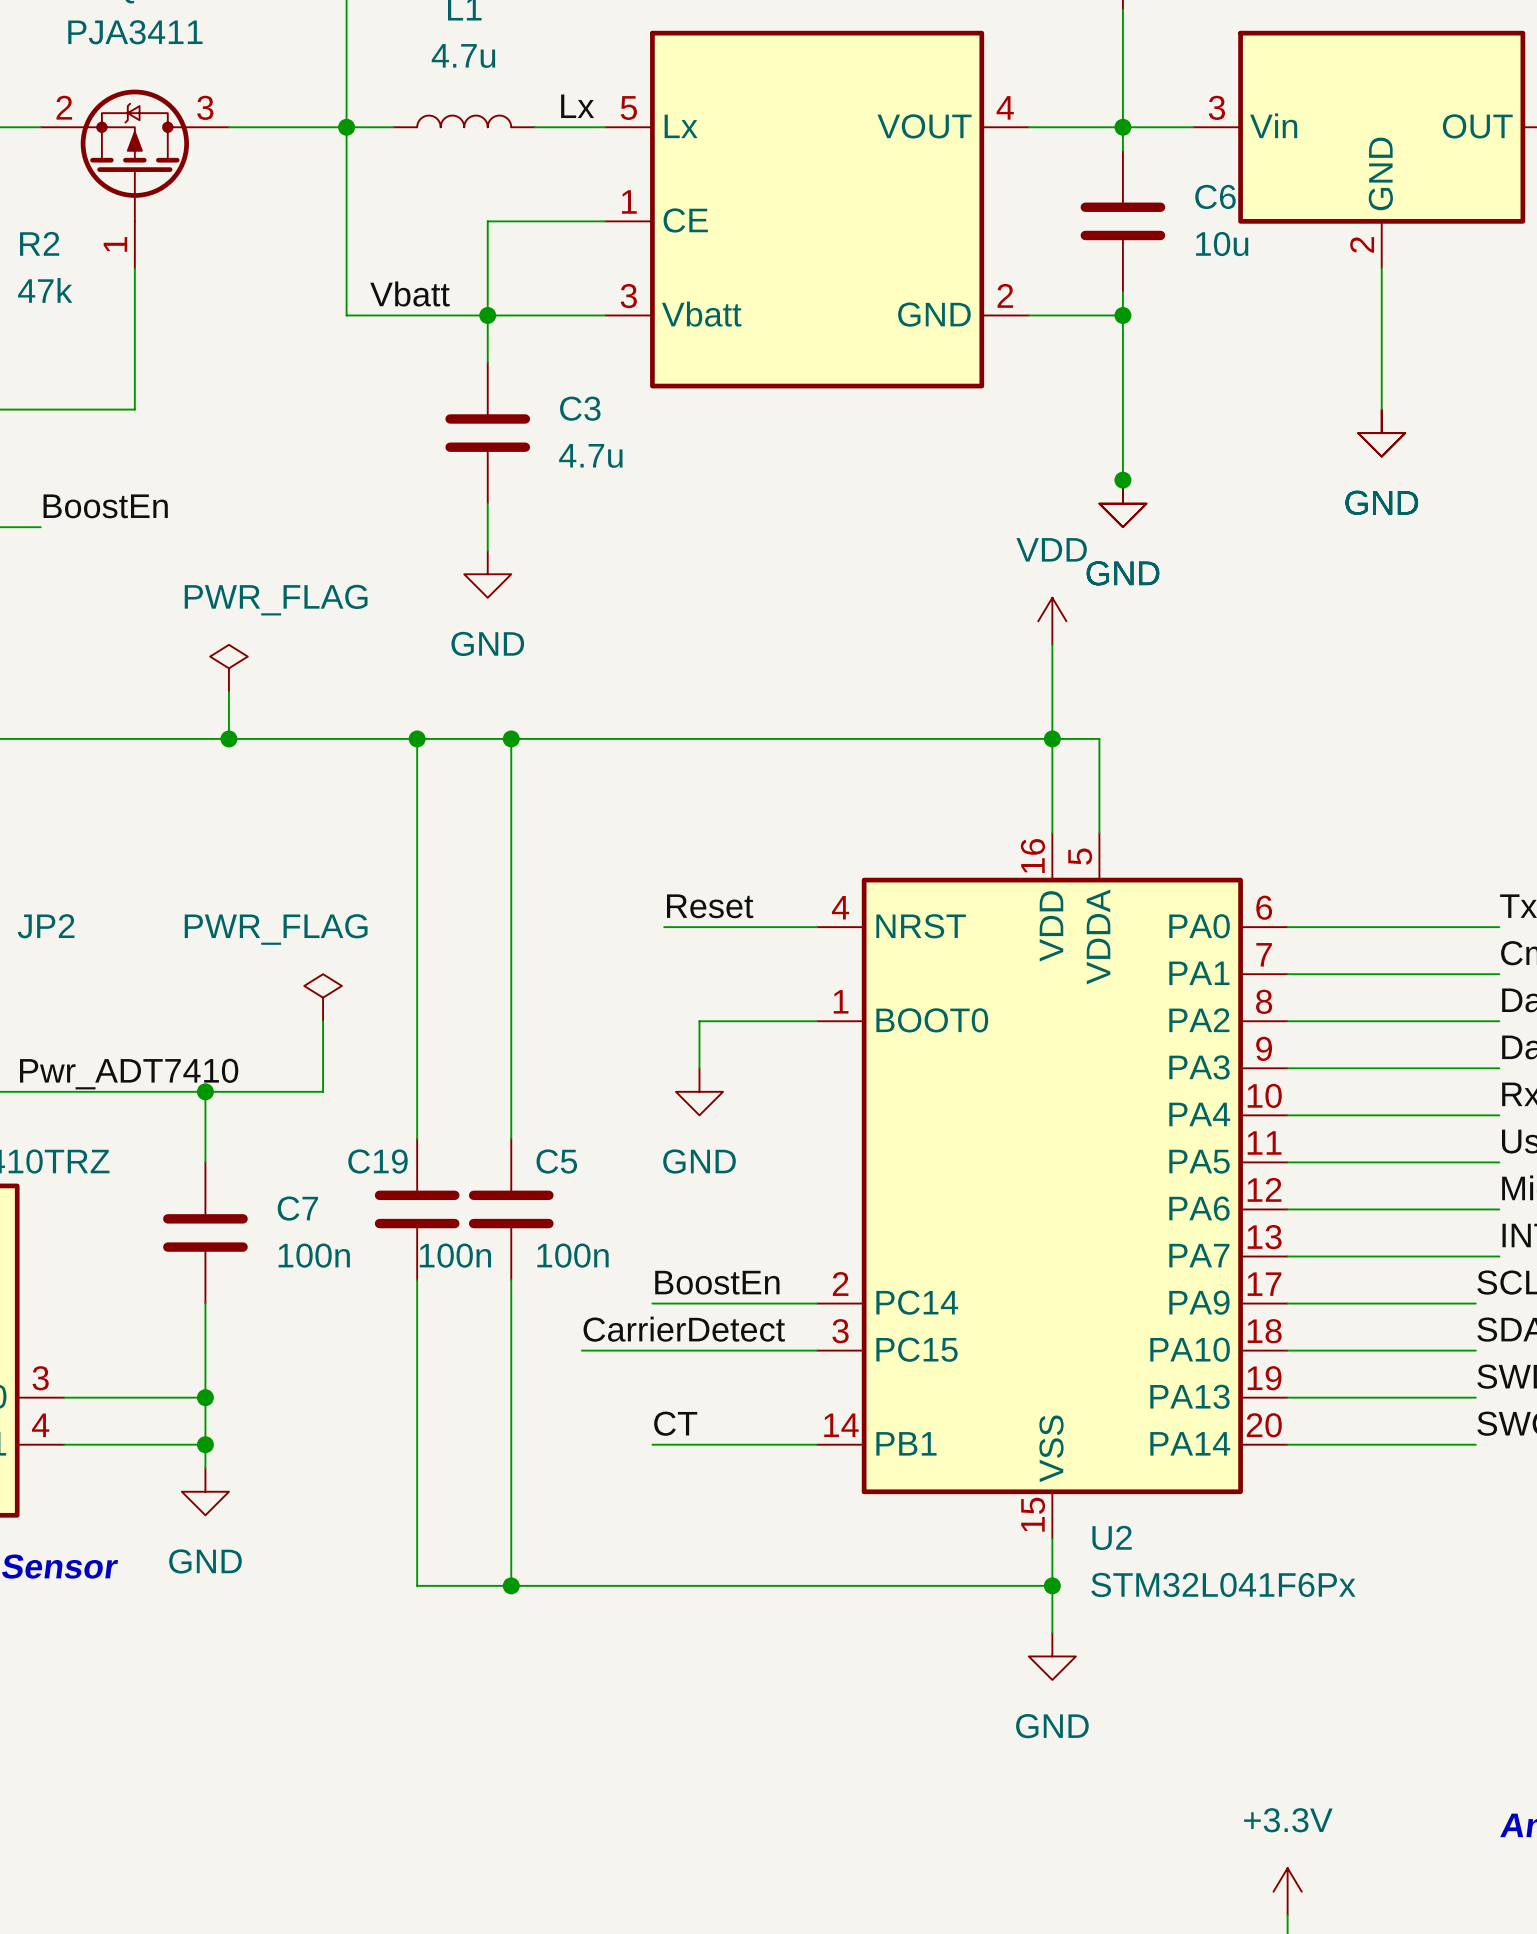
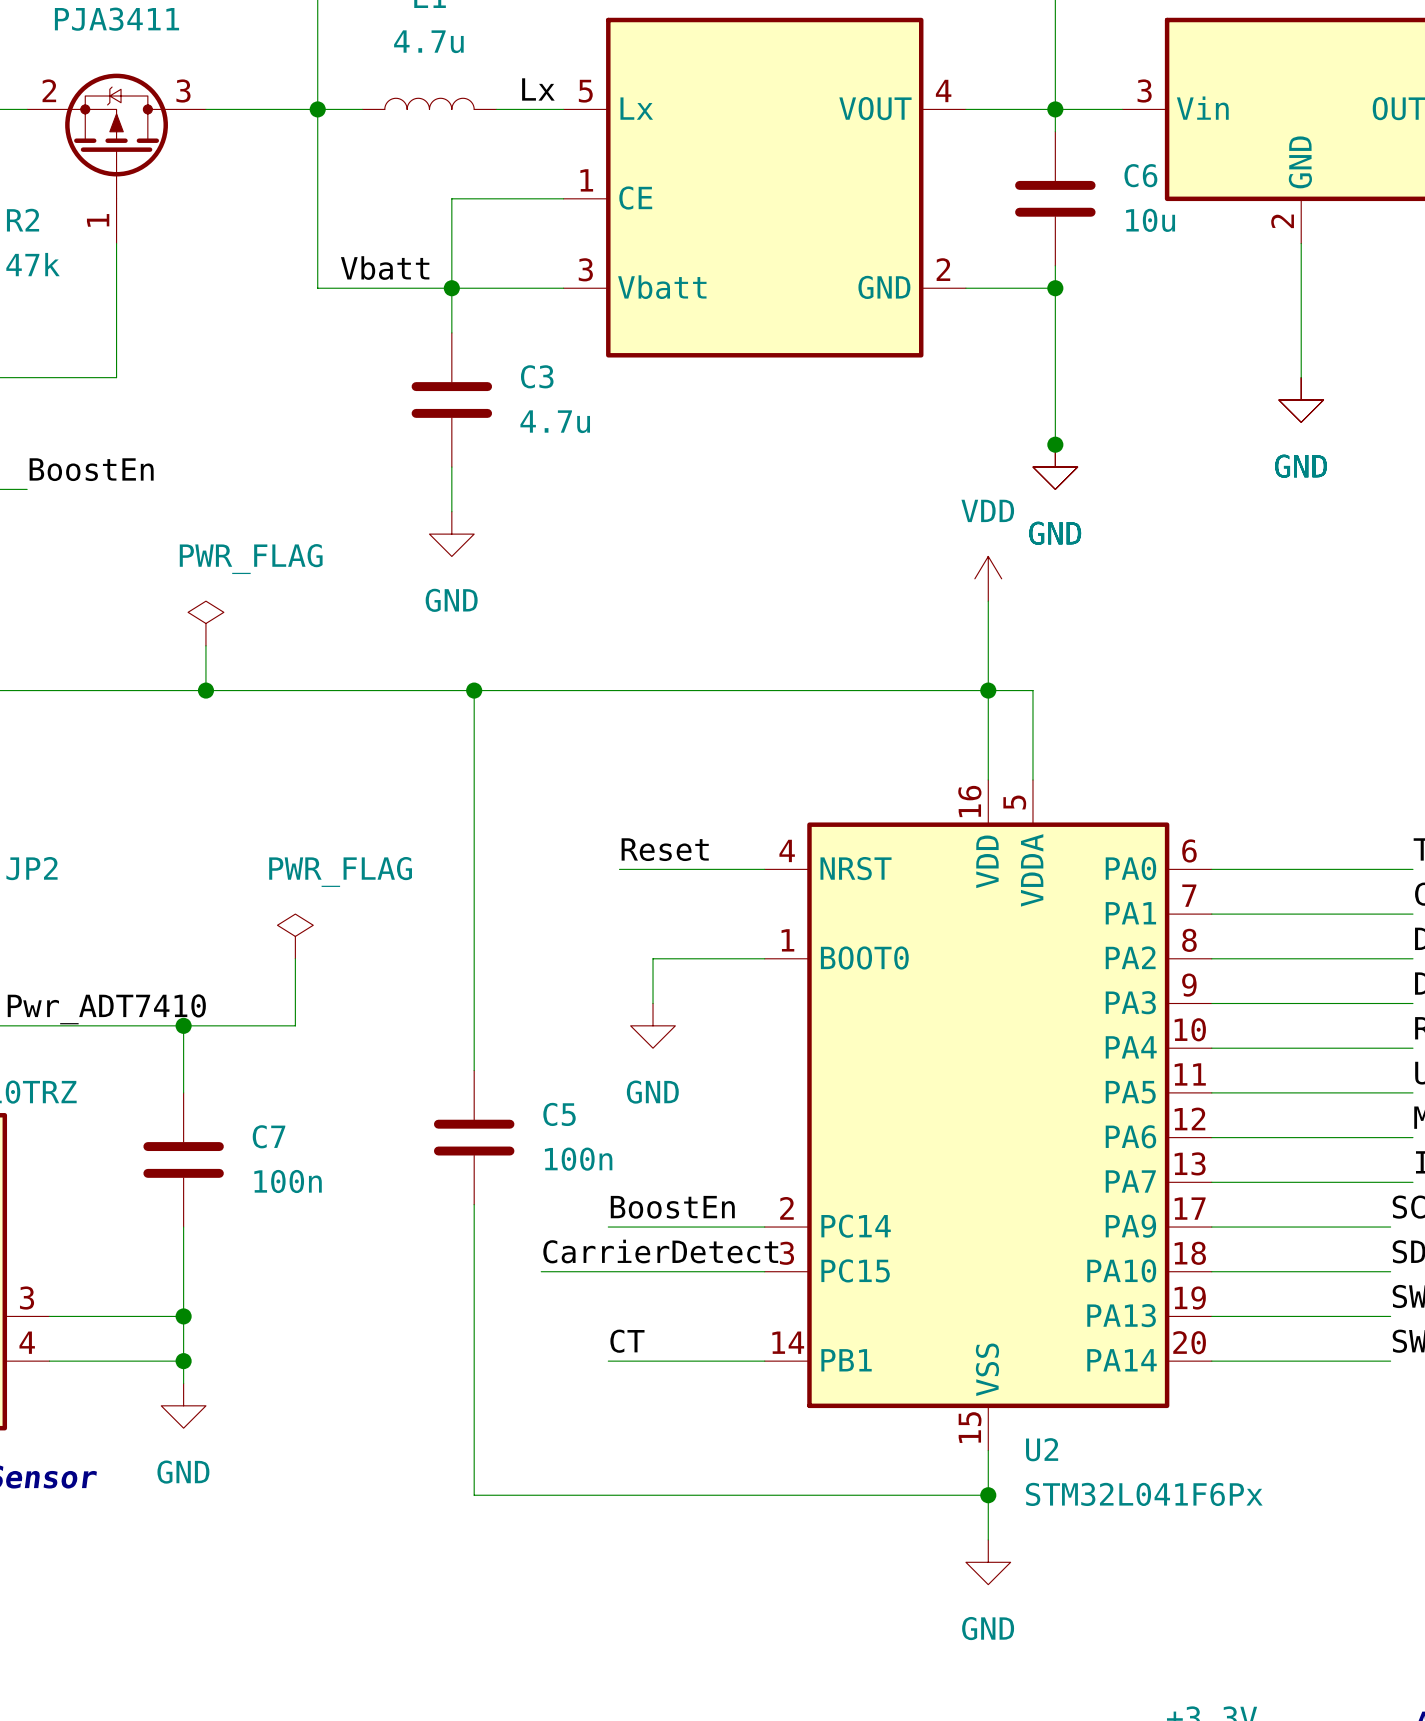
wire: (417, 738) (417, 1138) -> none
junction: (417, 738) -> none
power symbol text position: PWR_FLAG (276, 929) -> PWR_FLAG (340, 871)
C5 name position: C5 (556, 1161) -> C5 (559, 1114)
C19: 100n (417, 1209) -> none
C5 value position: 100n (573, 1255) -> 100n (578, 1159)
wire: (417, 1280) (417, 1585) (511, 1585) -> none
junction: (511, 1585) -> none

